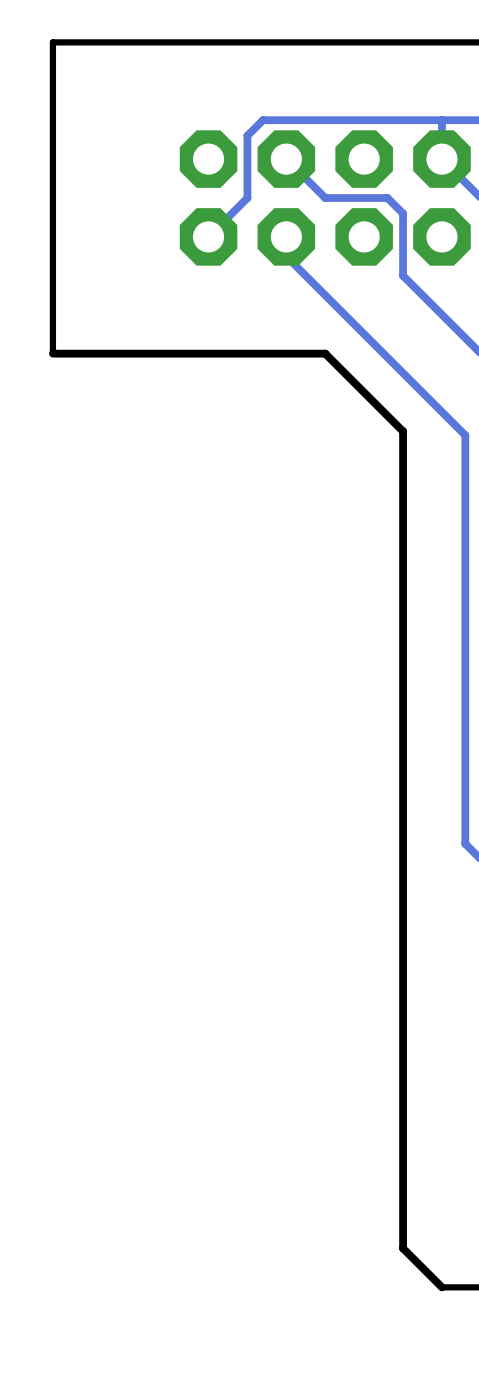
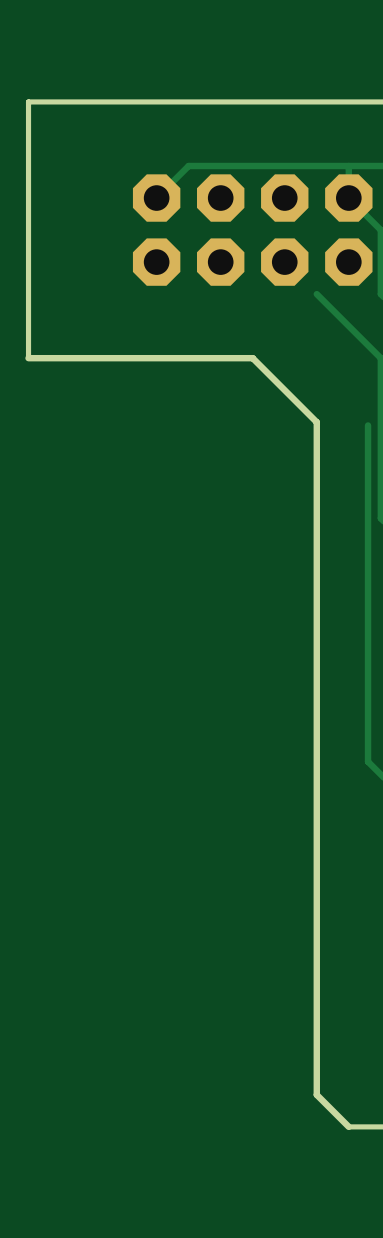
track: (263, 120) (247, 135) (247, 198) (208, 236) -> (201, 166) (188, 166) (156, 198)
track: (286, 159) (325, 198) (387, 198) (403, 213) (403, 275) -> none
track: (286, 236) (286, 256) (465, 435) -> none

